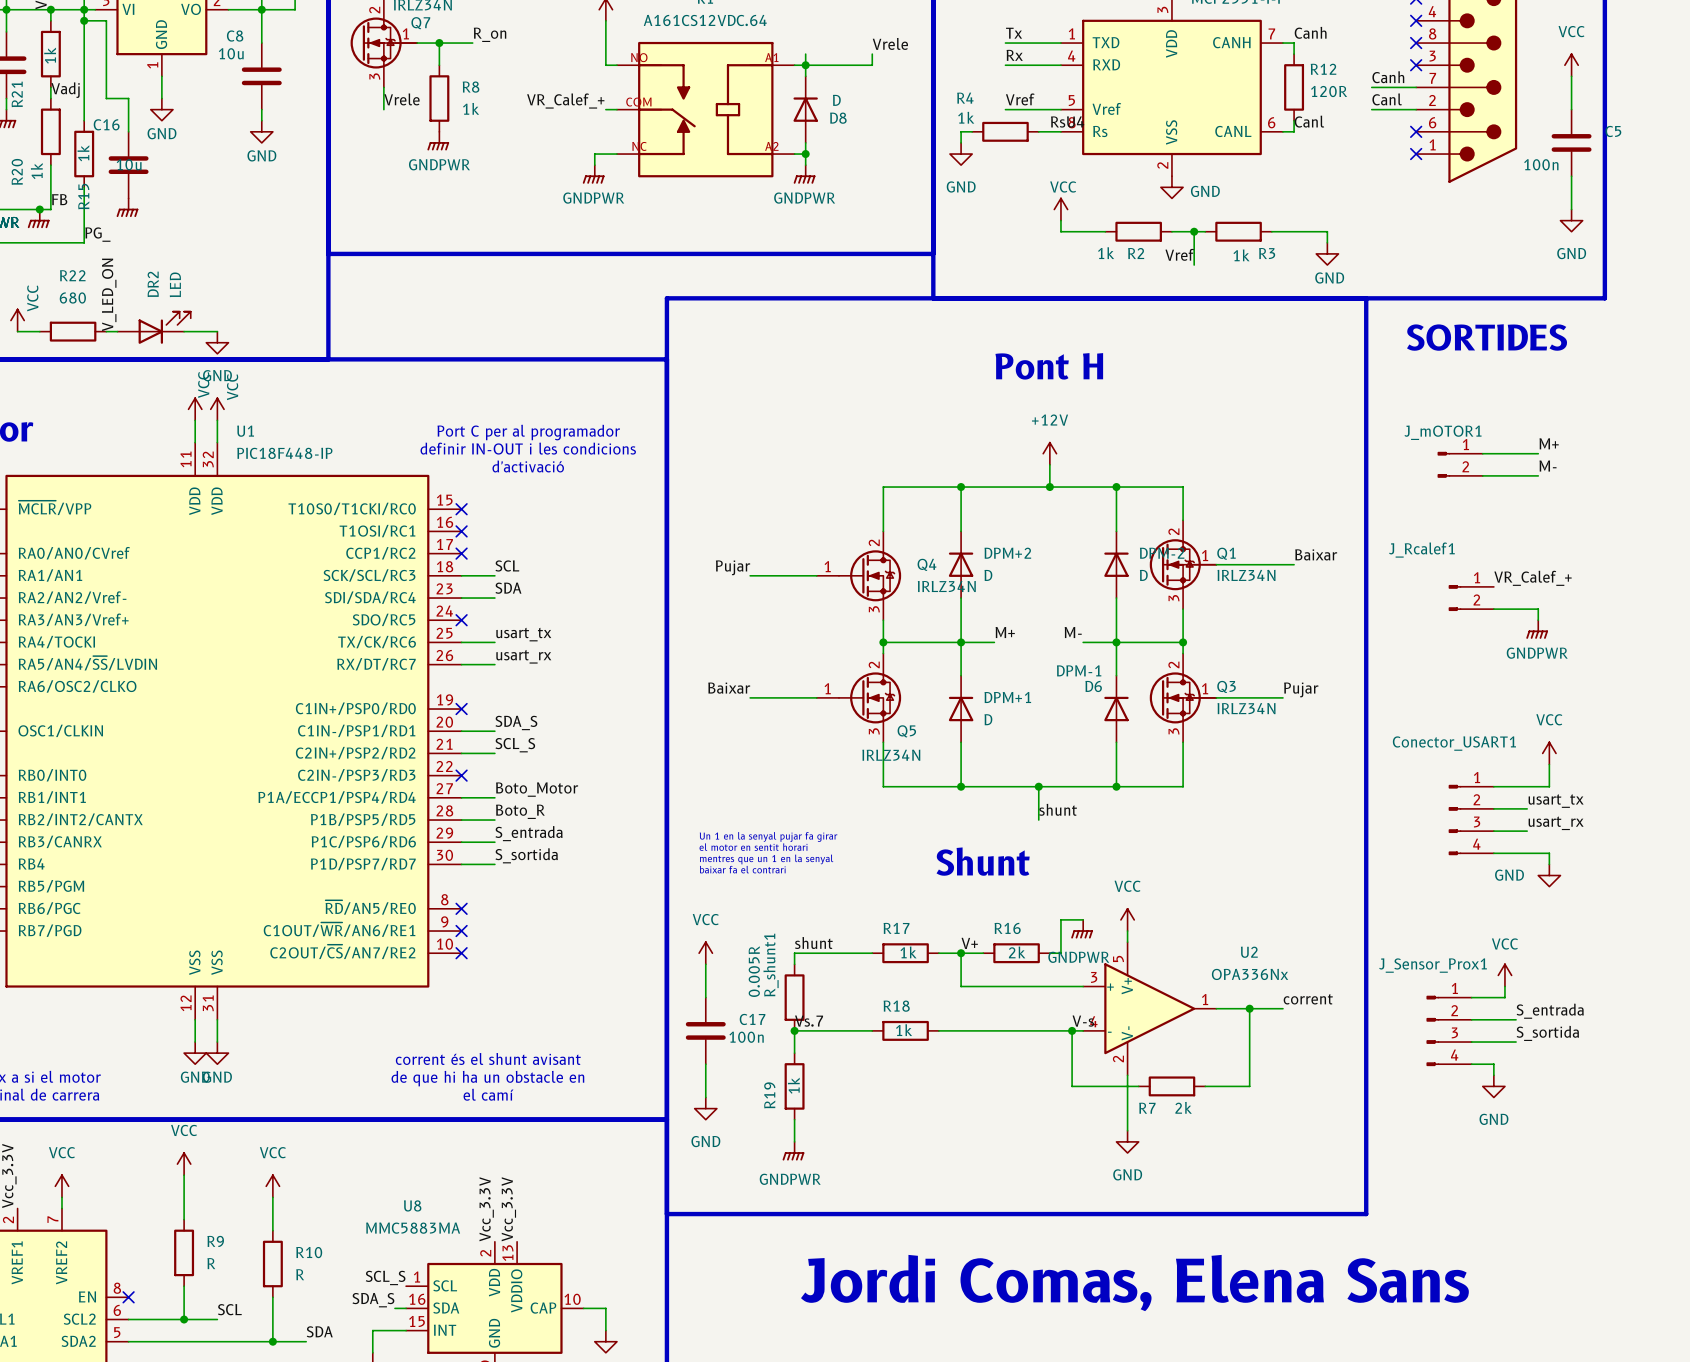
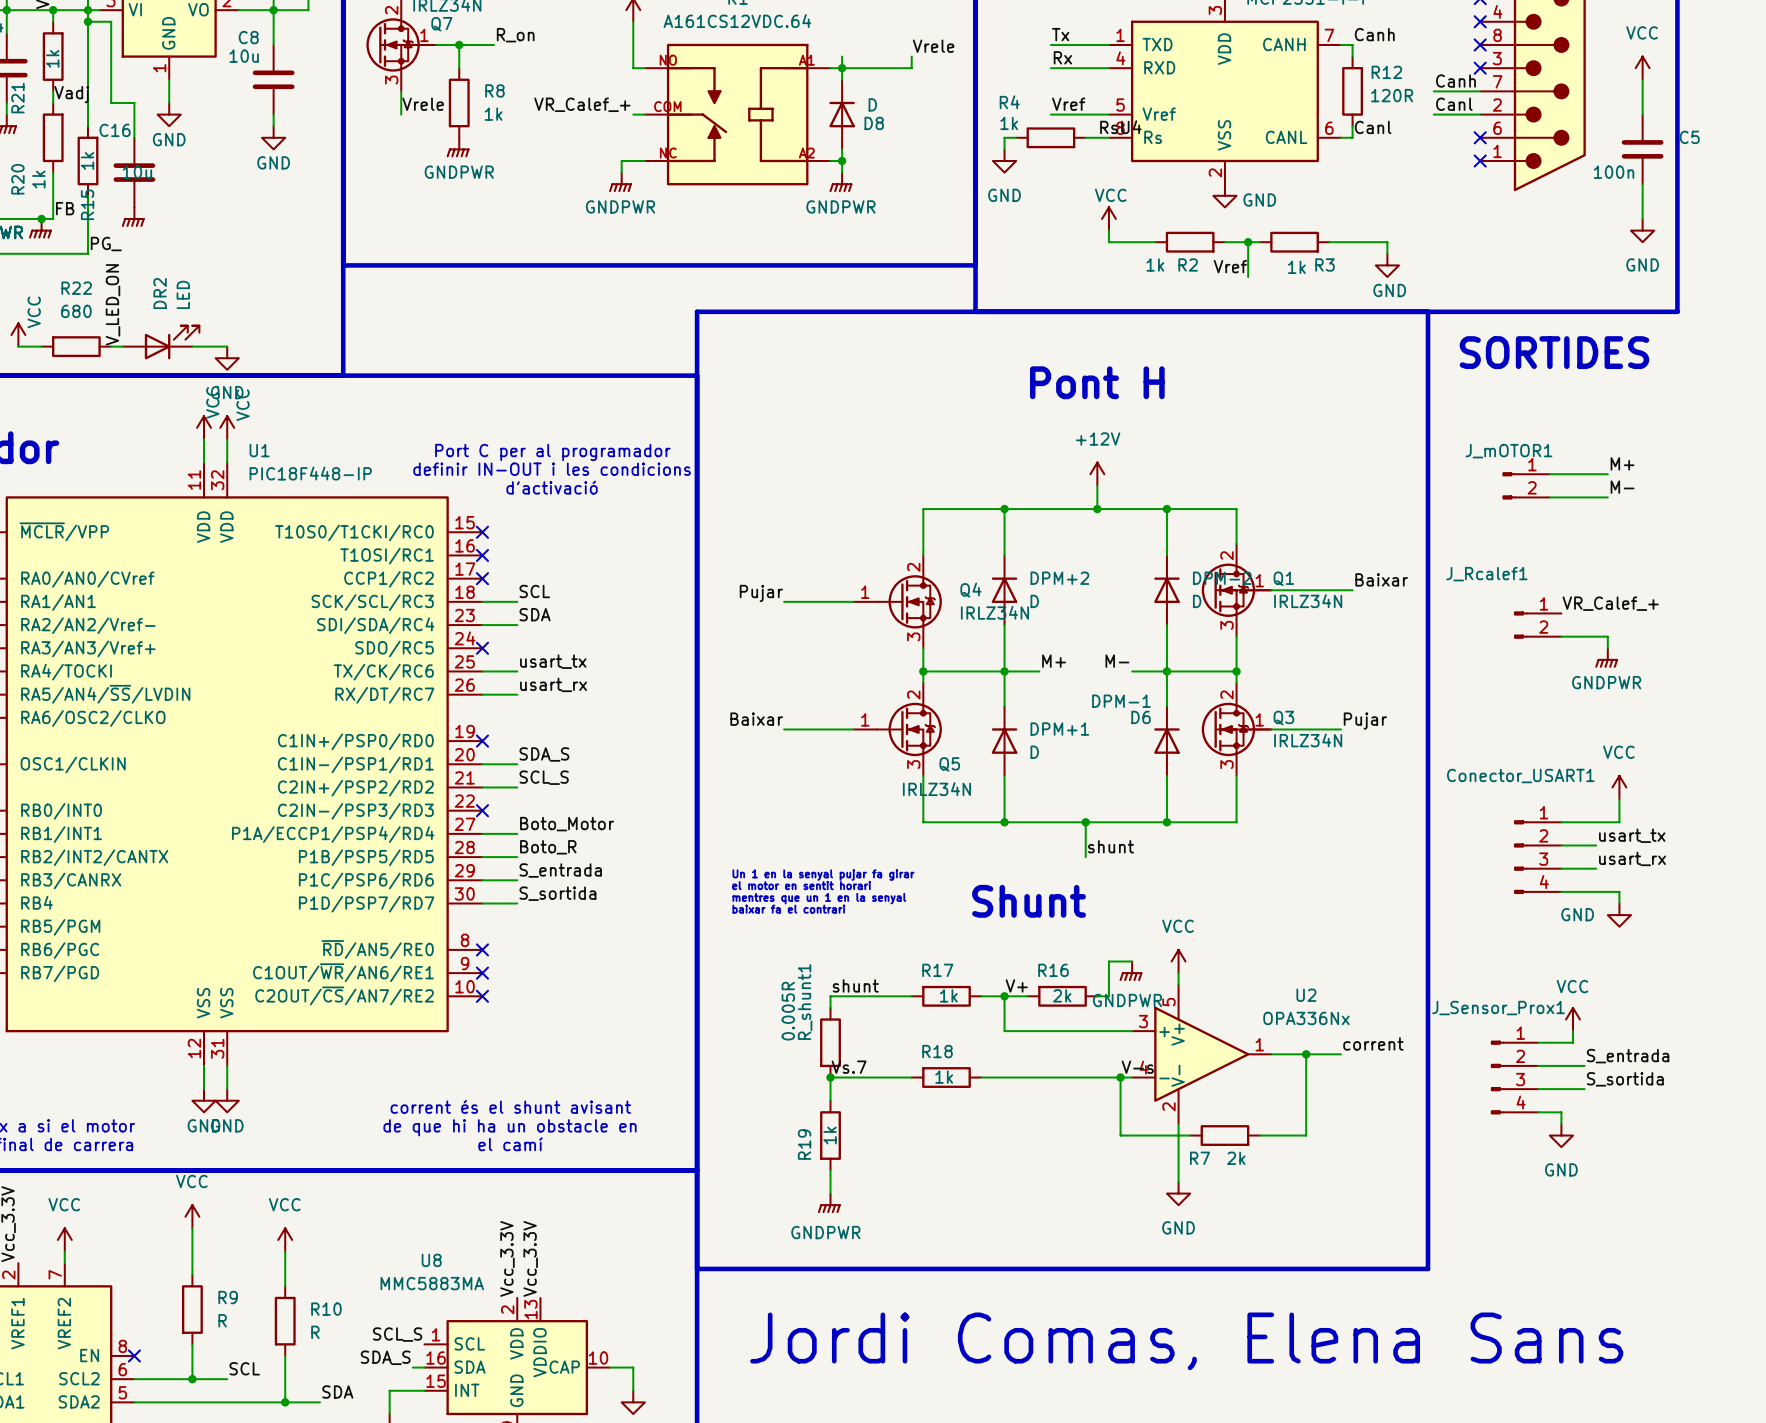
power symbol: VCC (705, 953) -> none
wire: (705, 964) (705, 997) -> none
C17: 100n (705, 1030) -> none
wire: (705, 1064) (705, 1097) -> none
power symbol: GND (705, 1108) -> none

